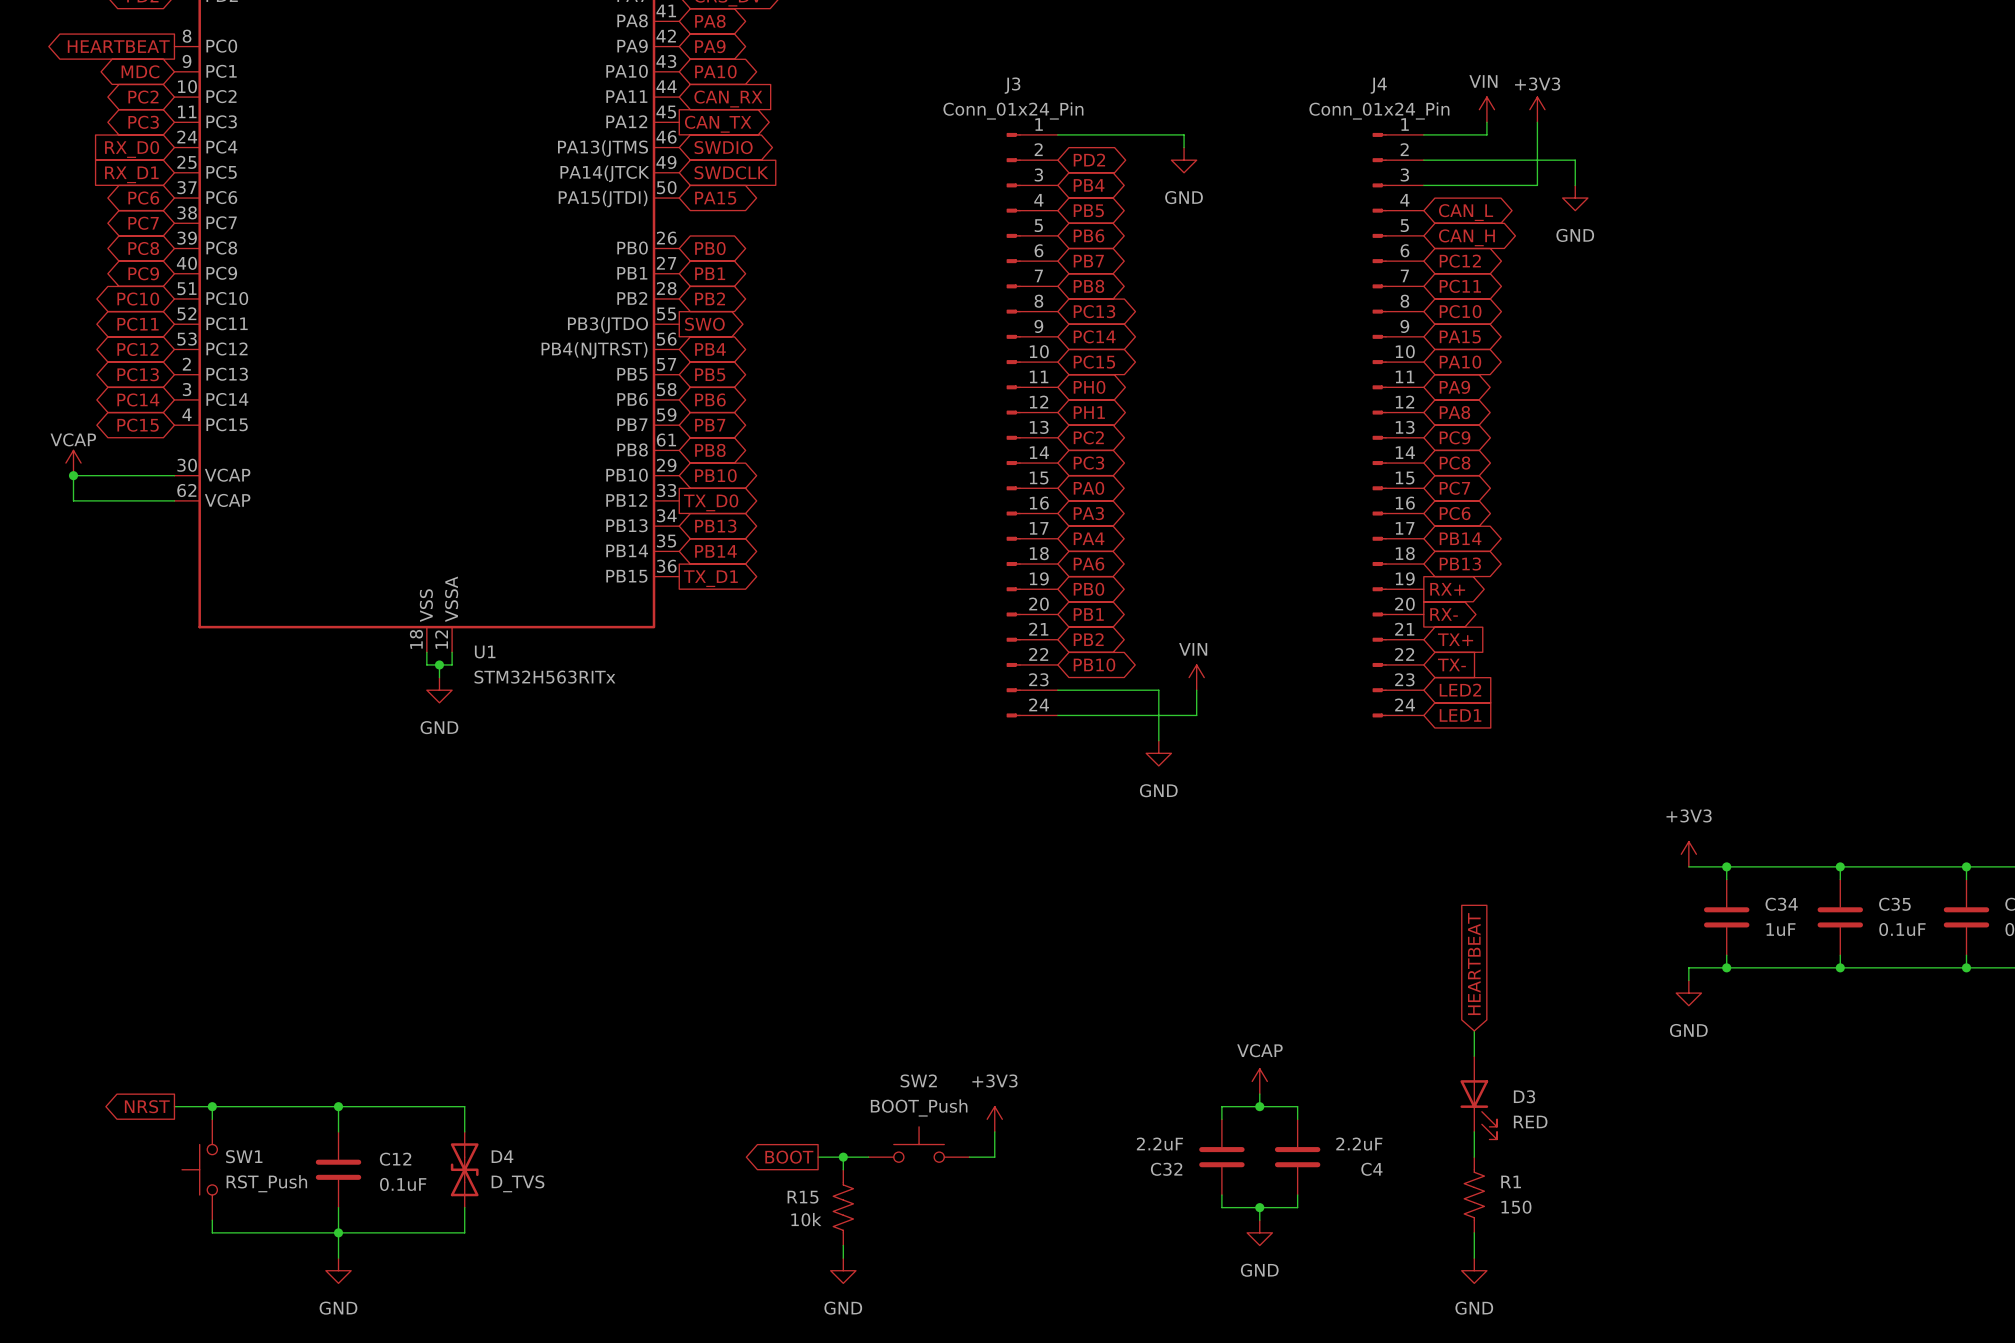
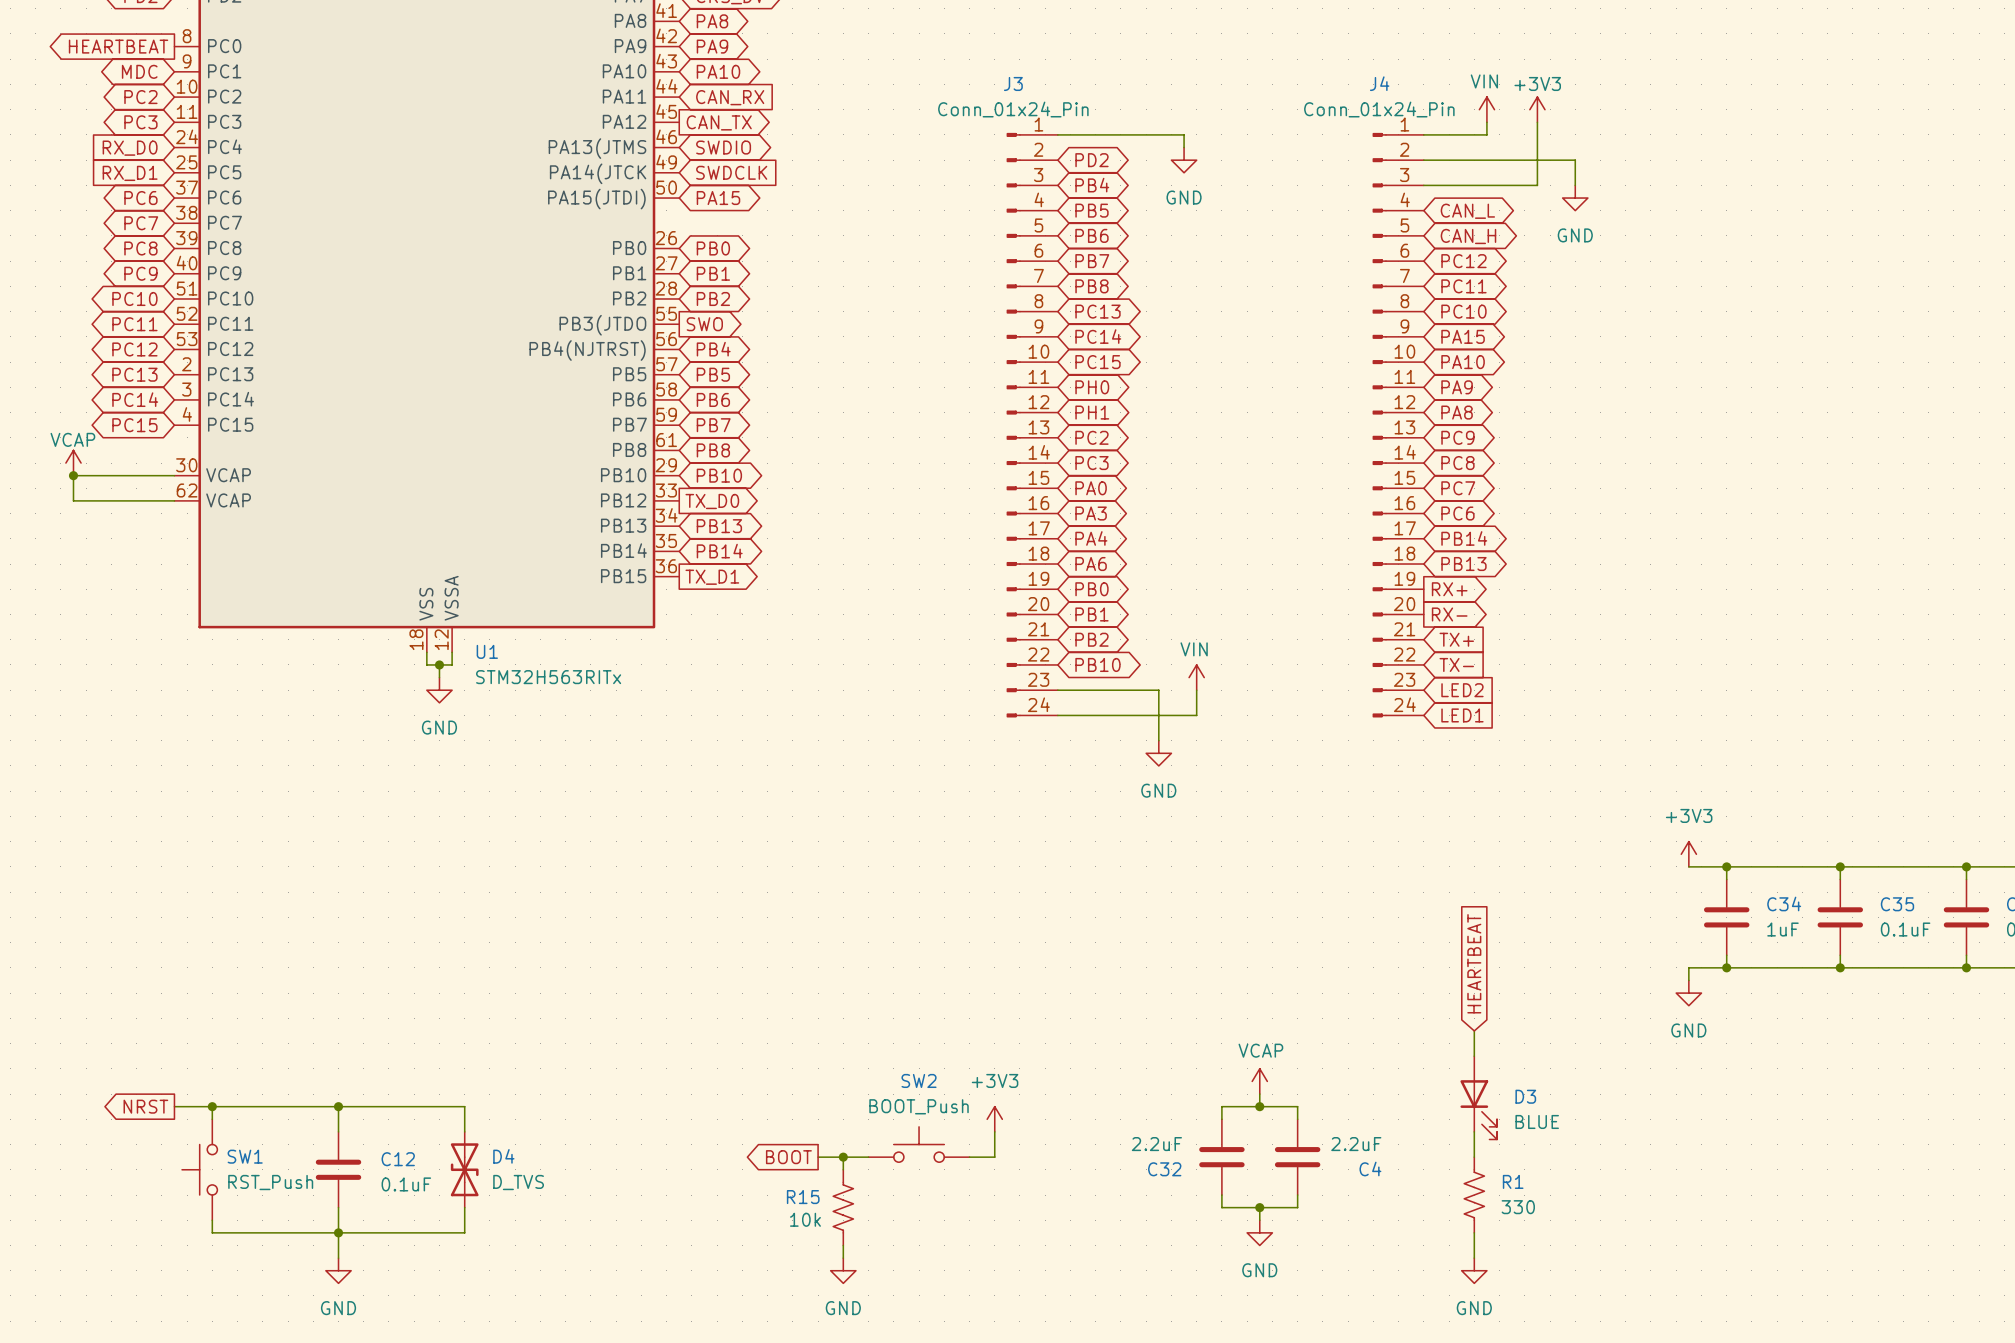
D3 value: RED (1530, 1121) -> BLUE (1537, 1121)
R1 value: 150 (1516, 1207) -> 330 (1518, 1207)

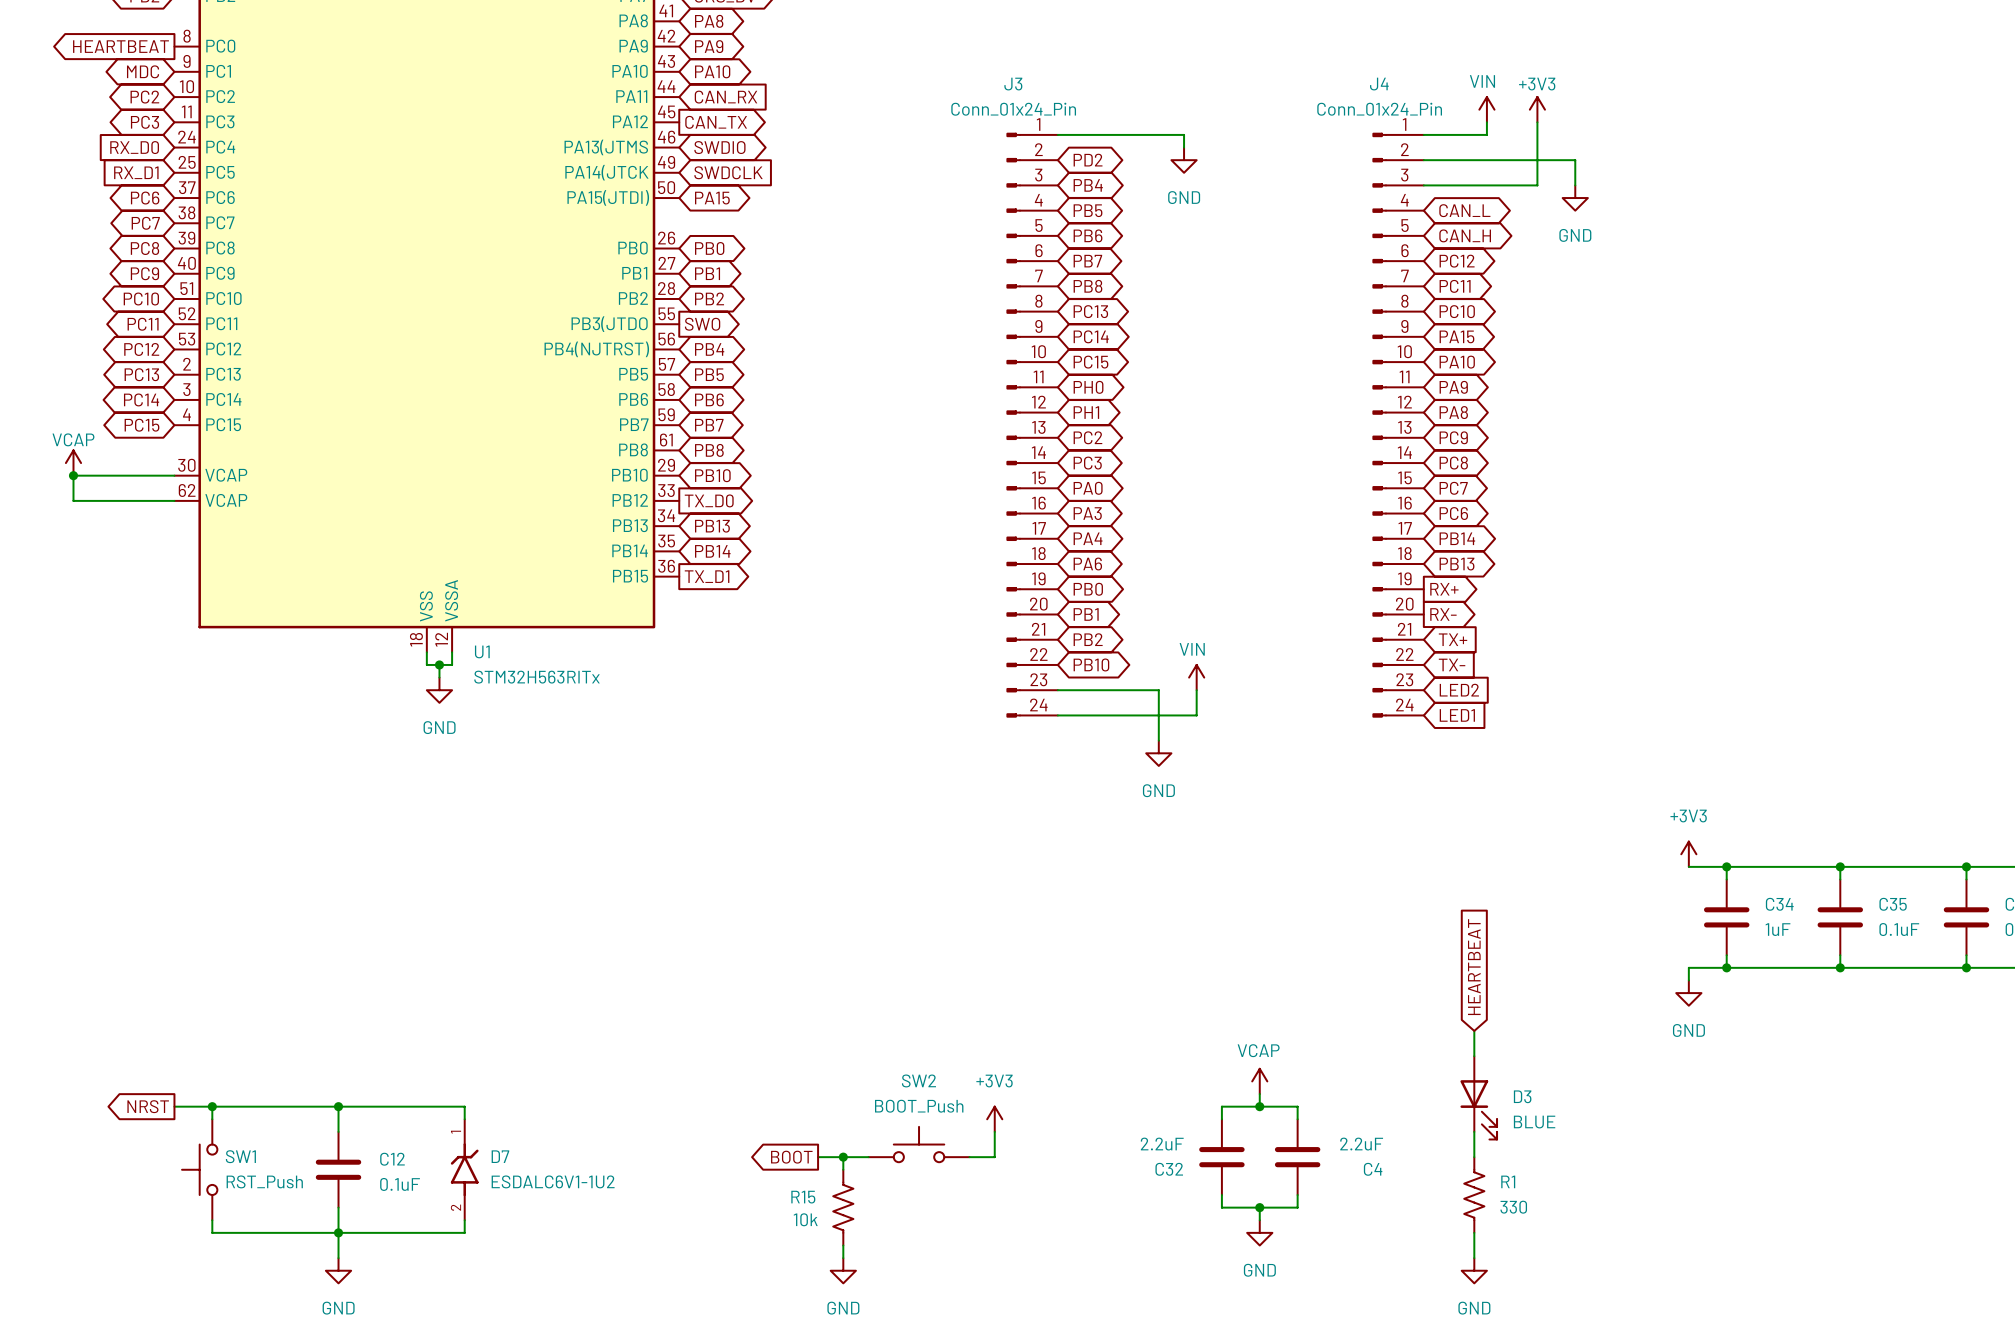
D4: D_TVS (464, 1169) -> none
D7: none -> ESDALC6V1-1U2 (464, 1169)

